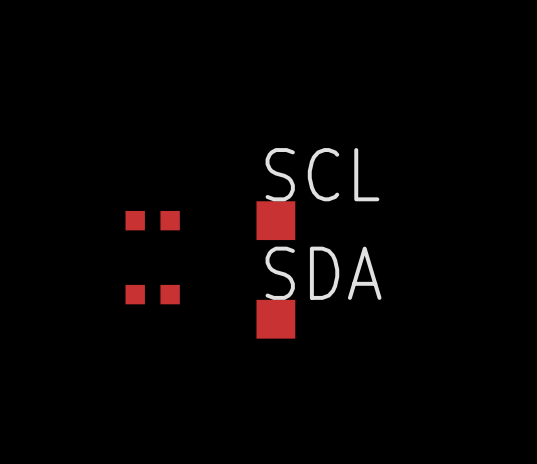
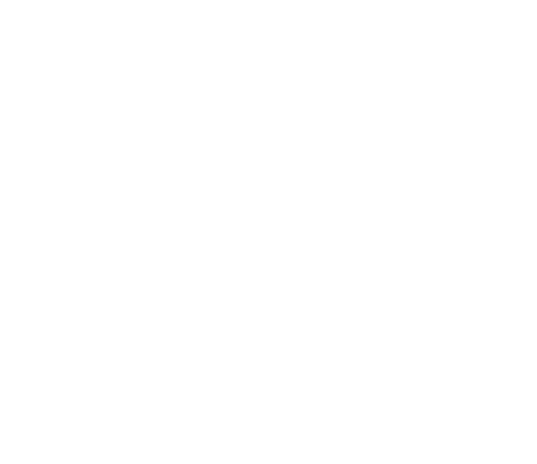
part: (152, 220) -> none
SCL: (275, 220) -> none
part: (152, 294) -> none
SDA: (275, 319) -> none

